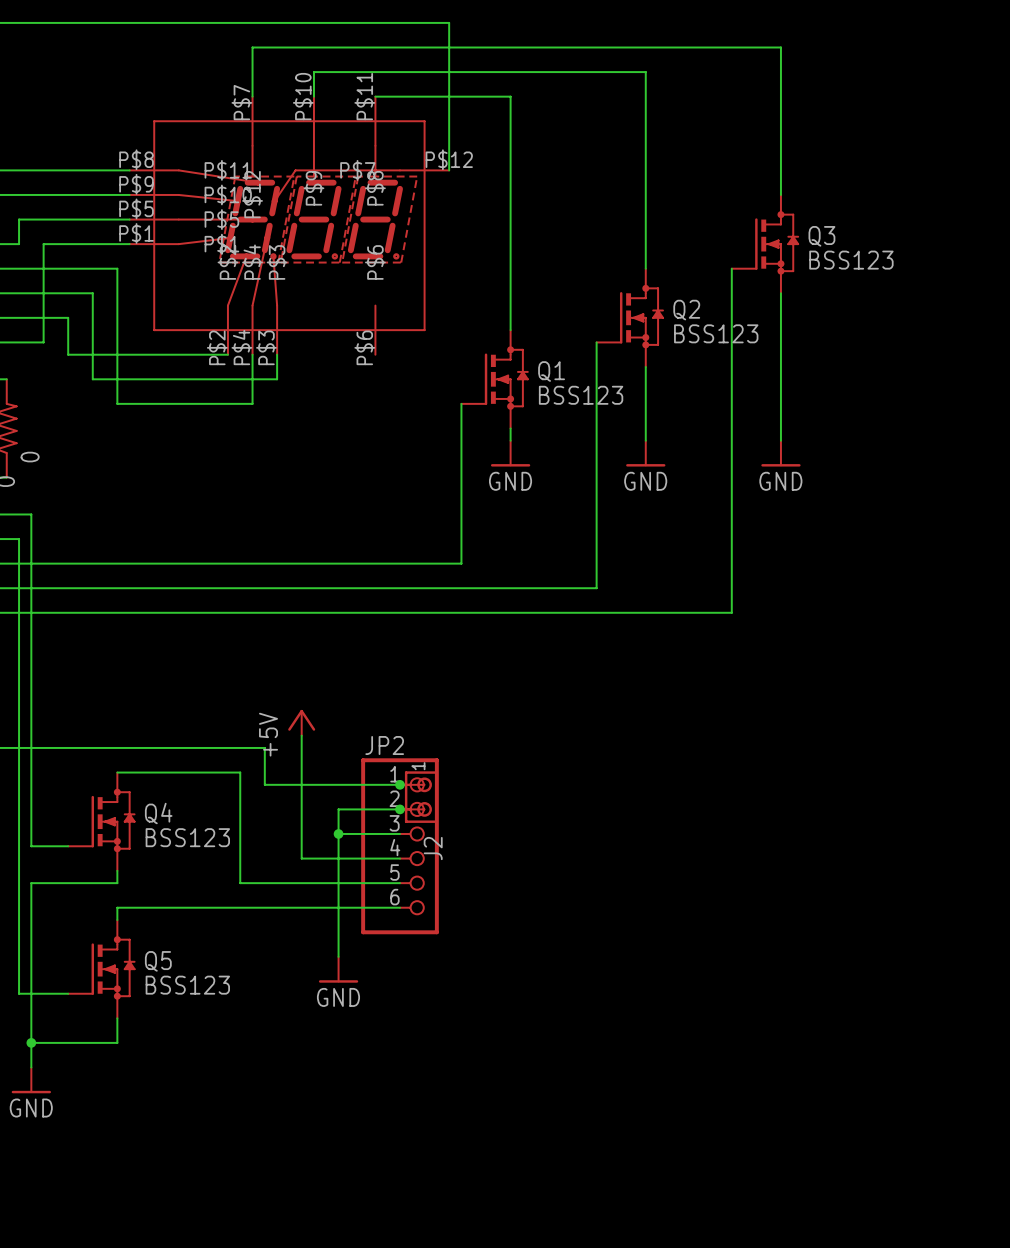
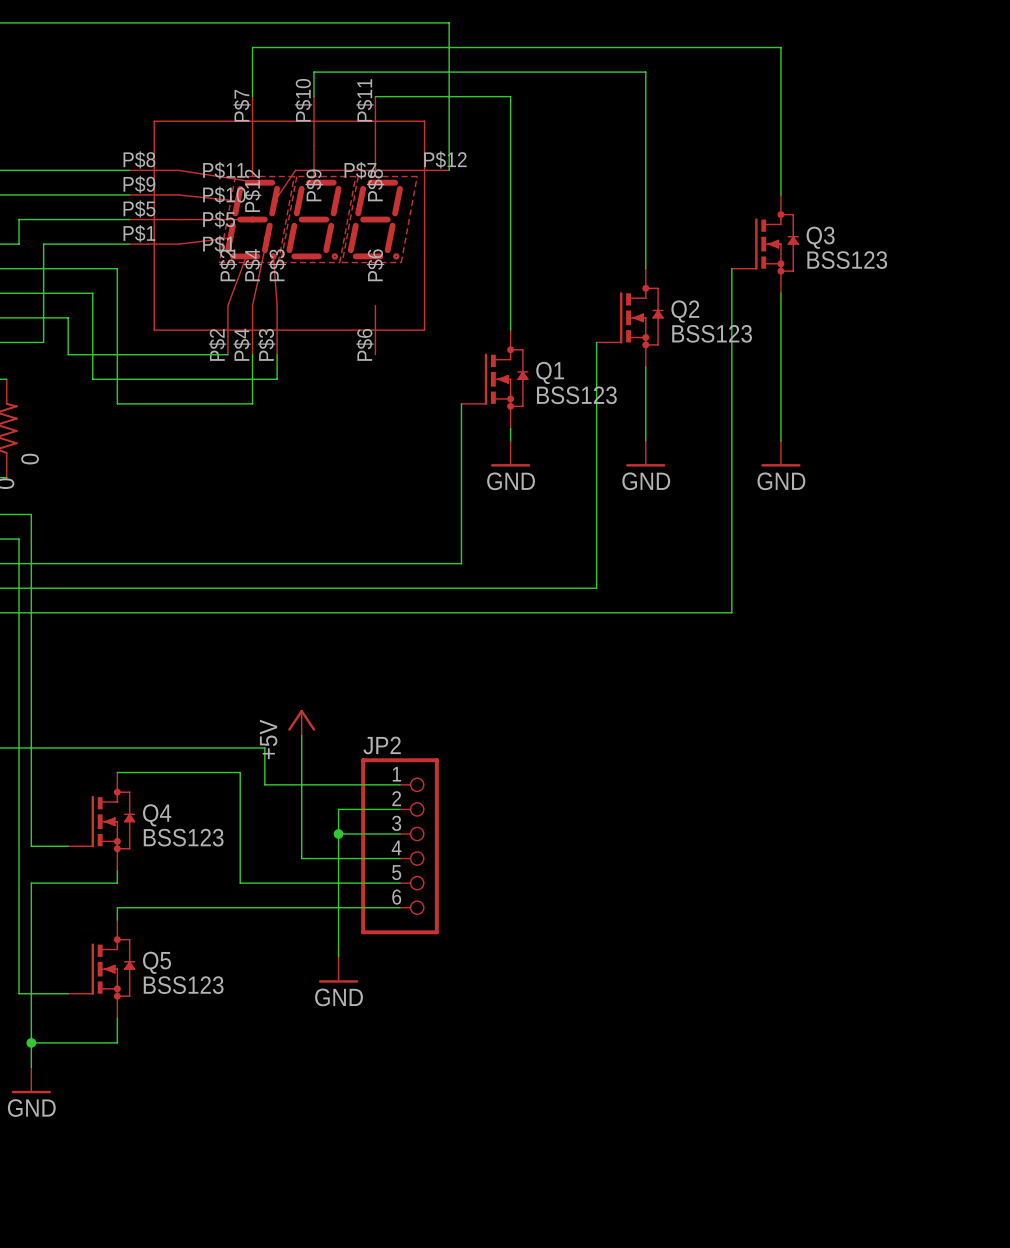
junction: (400, 784) -> none
J2: (419, 797) -> none
junction: (400, 809) -> none

